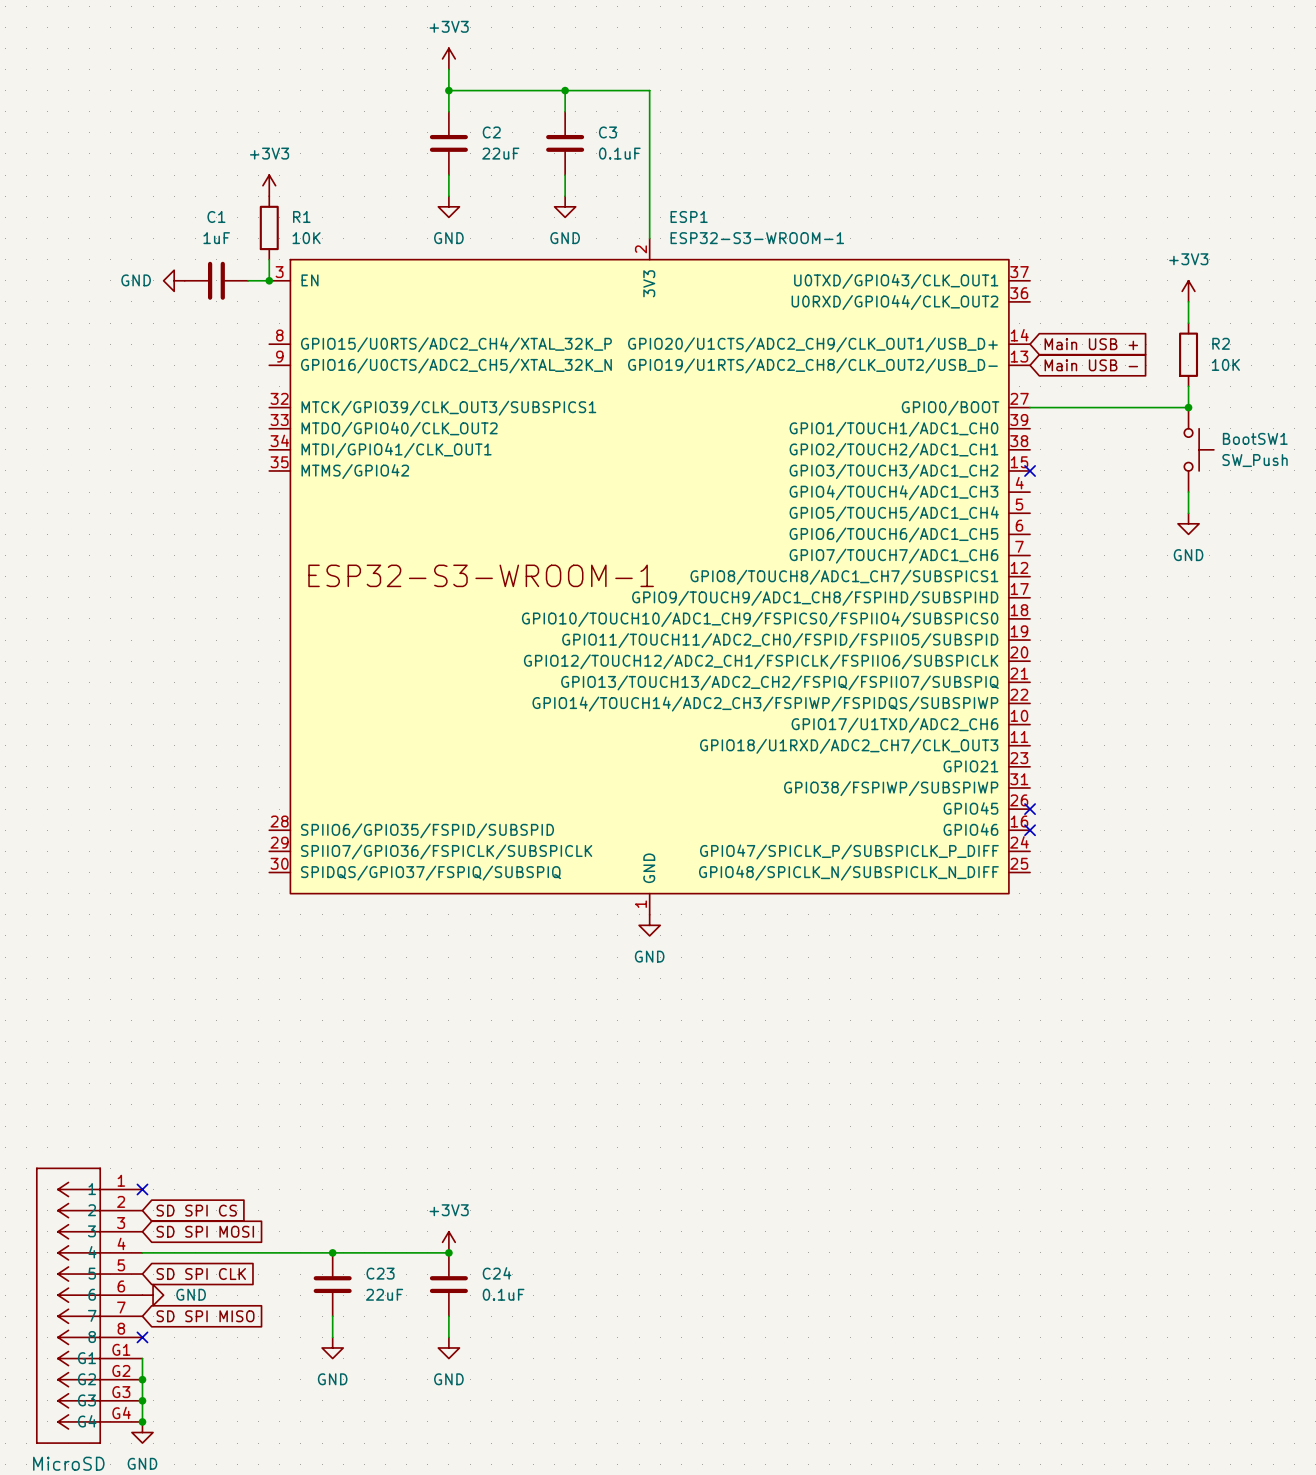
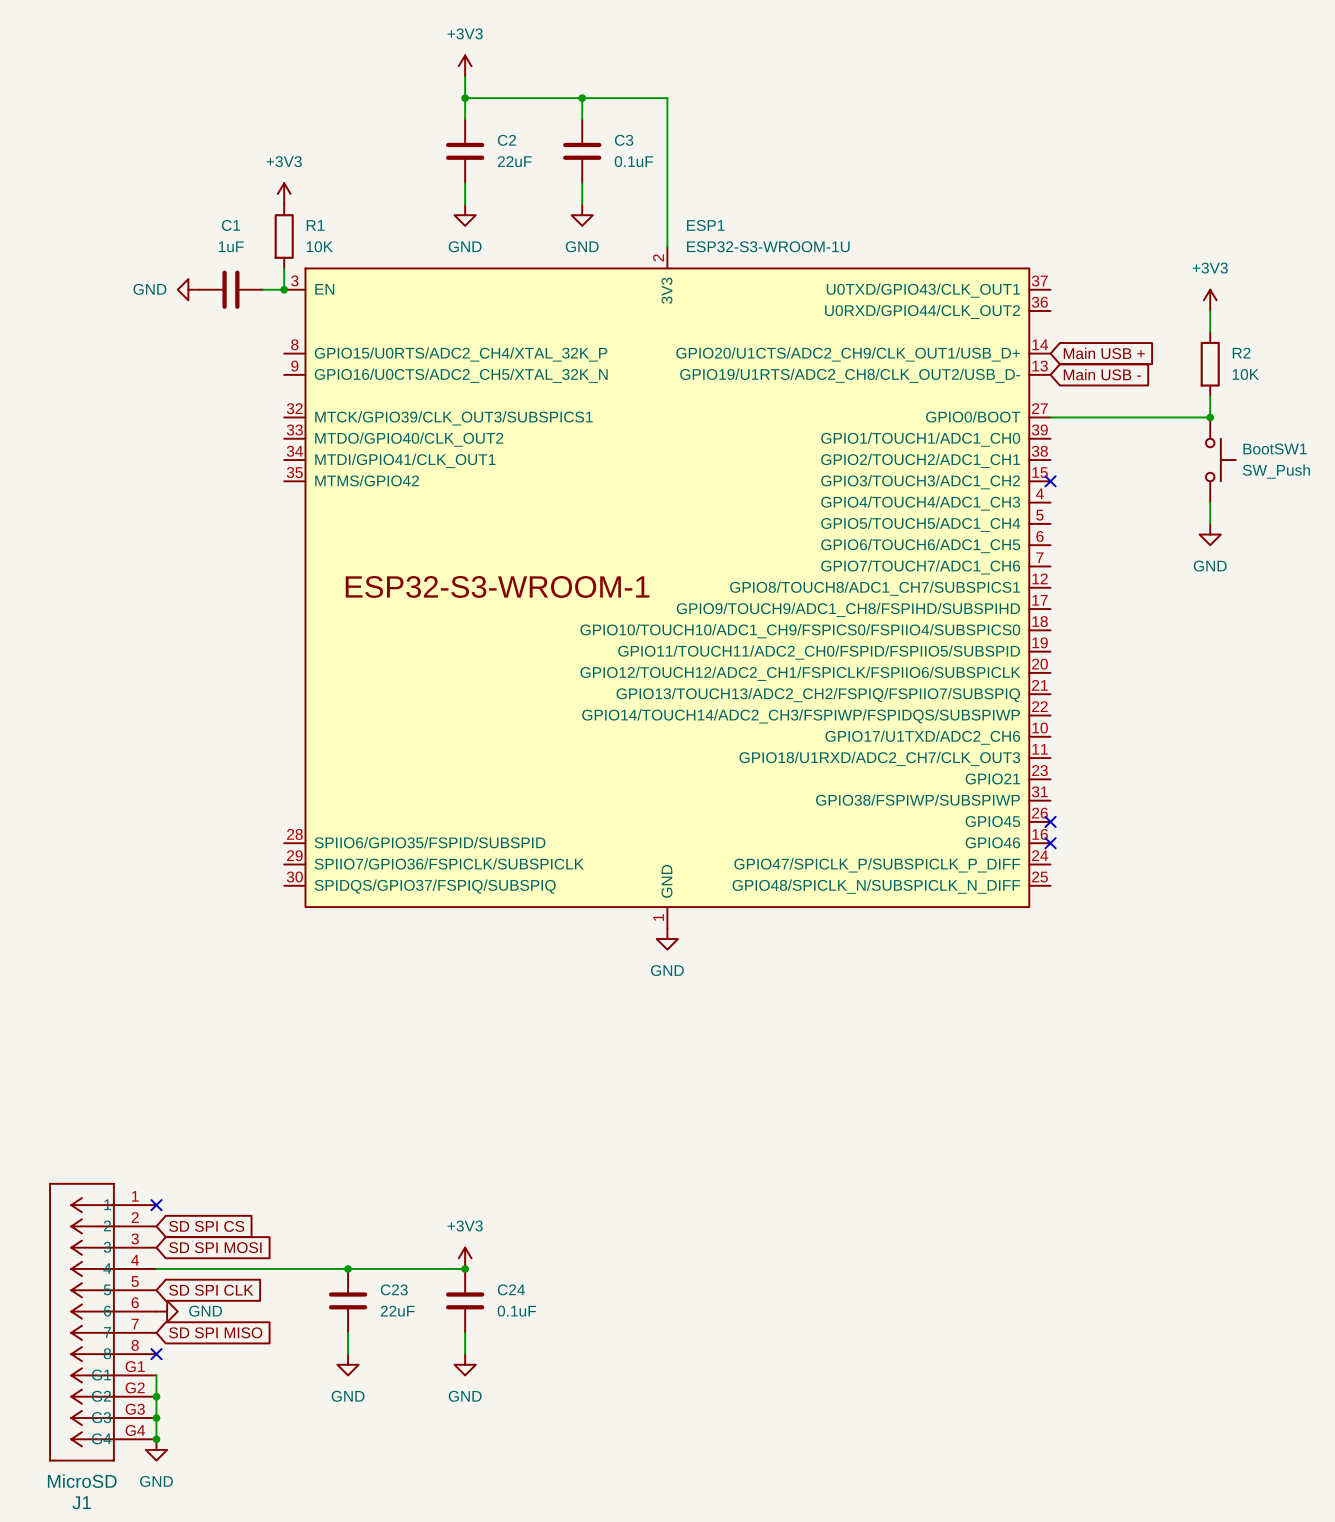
ESP1 value: ESP32-S3-WROOM-1 (757, 238) -> ESP32-S3-WROOM-1U (768, 246)

